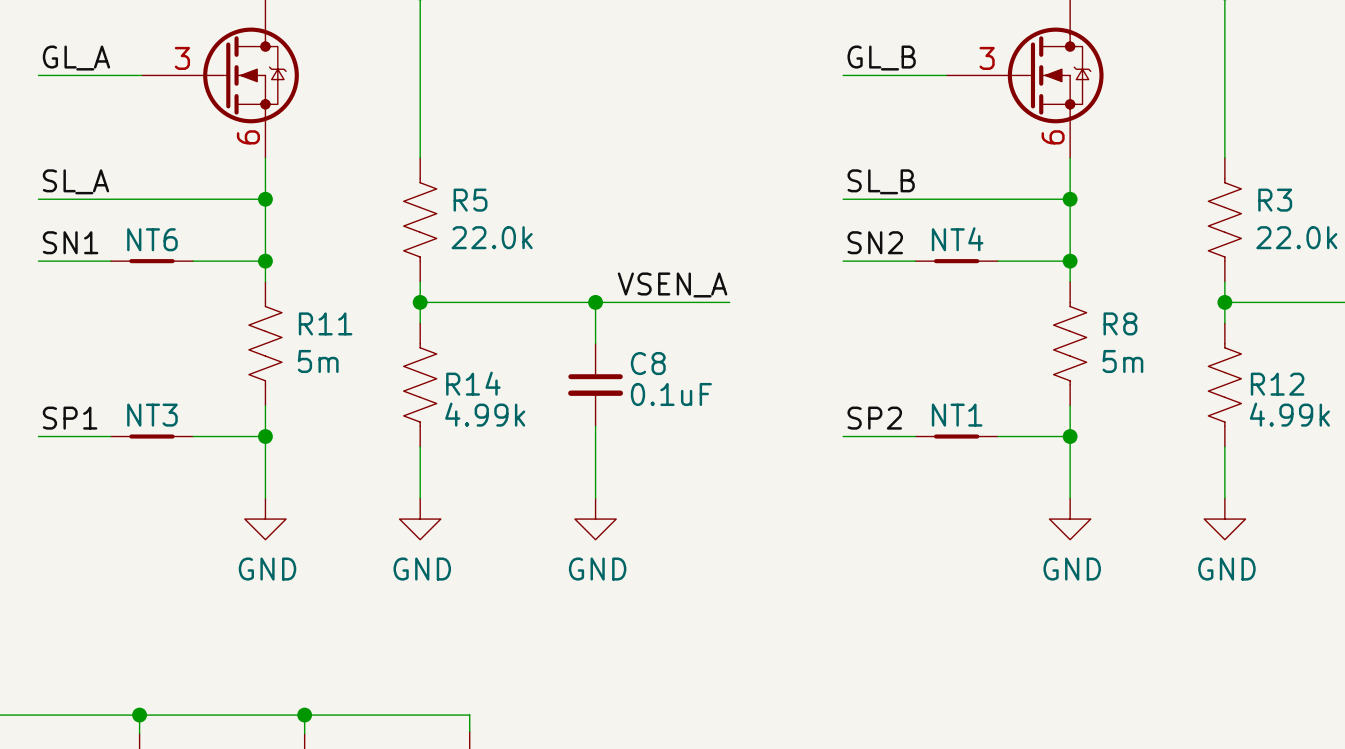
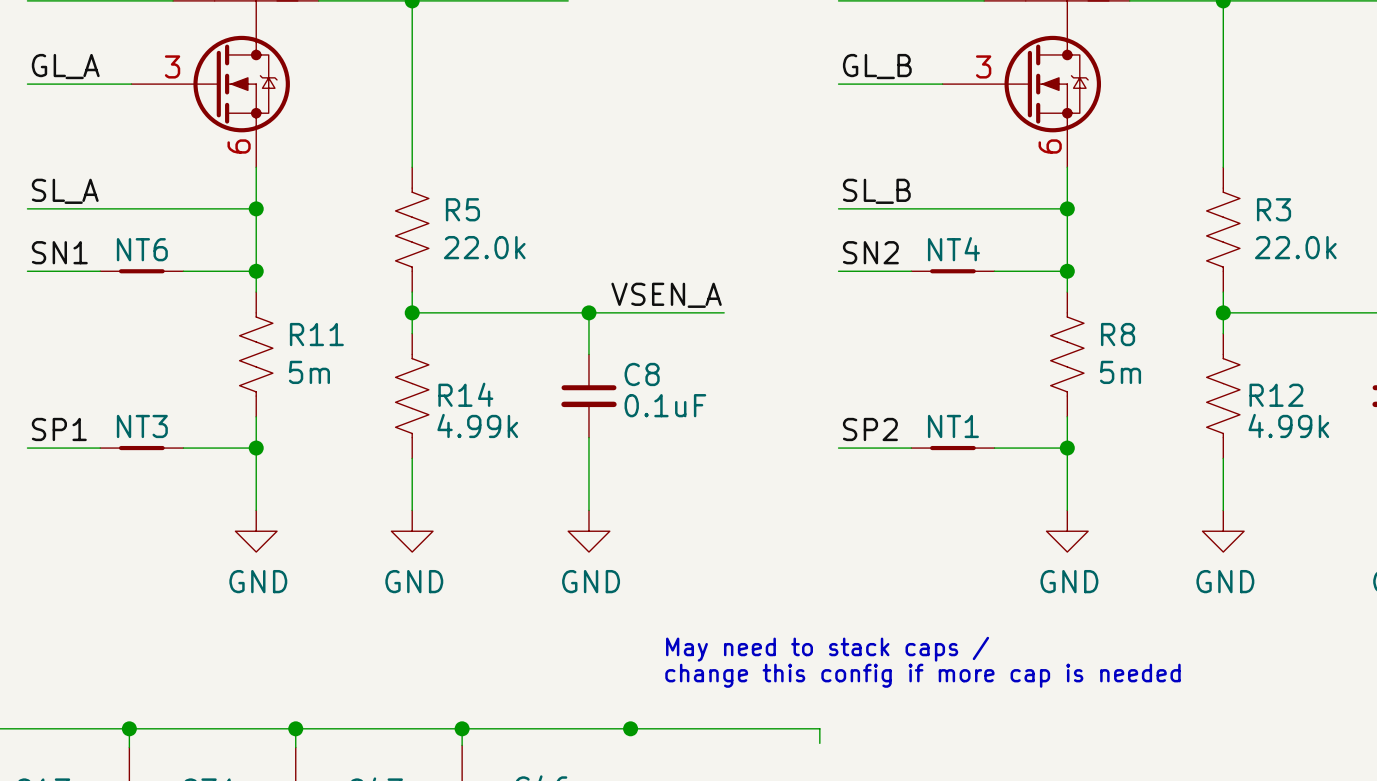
text: none -> May need to stack caps / (827, 649)
text: none -> change this config if more cap is needed (922, 675)
wire: none -> (462, 728) (819, 728) (819, 743)
junction: none -> (462, 728)
junction: none -> (630, 728)

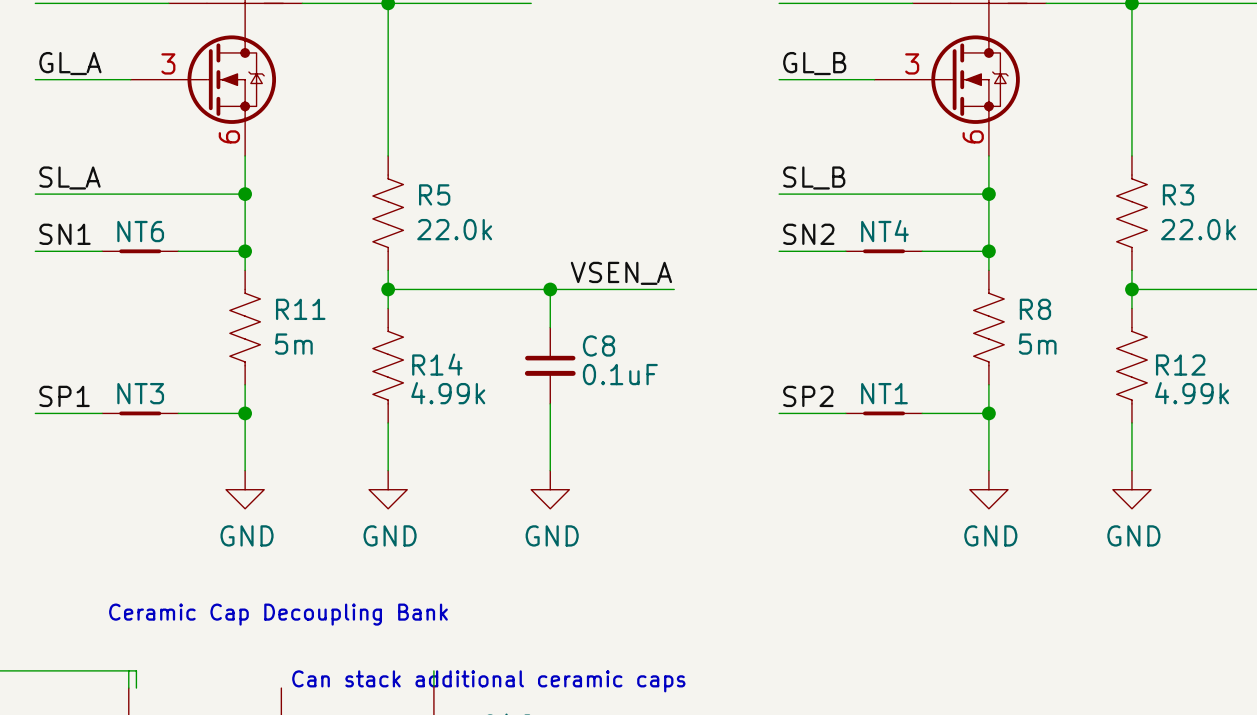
text: May need to stack caps / (827, 649) -> none
text: none -> Ceramic Cap Decoupling Bank (278, 614)
text: change this config if more cap is needed (922, 675) -> none
junction: (129, 728) -> none
wire: (137, 728) (819, 728) (819, 743) -> (136, 670) (136, 688)
wire: (295, 728) (295, 747) -> none
junction: (295, 728) -> none
junction: (462, 728) -> none
junction: (630, 728) -> none
text: none -> Can stack additional ceramic caps (488, 681)

